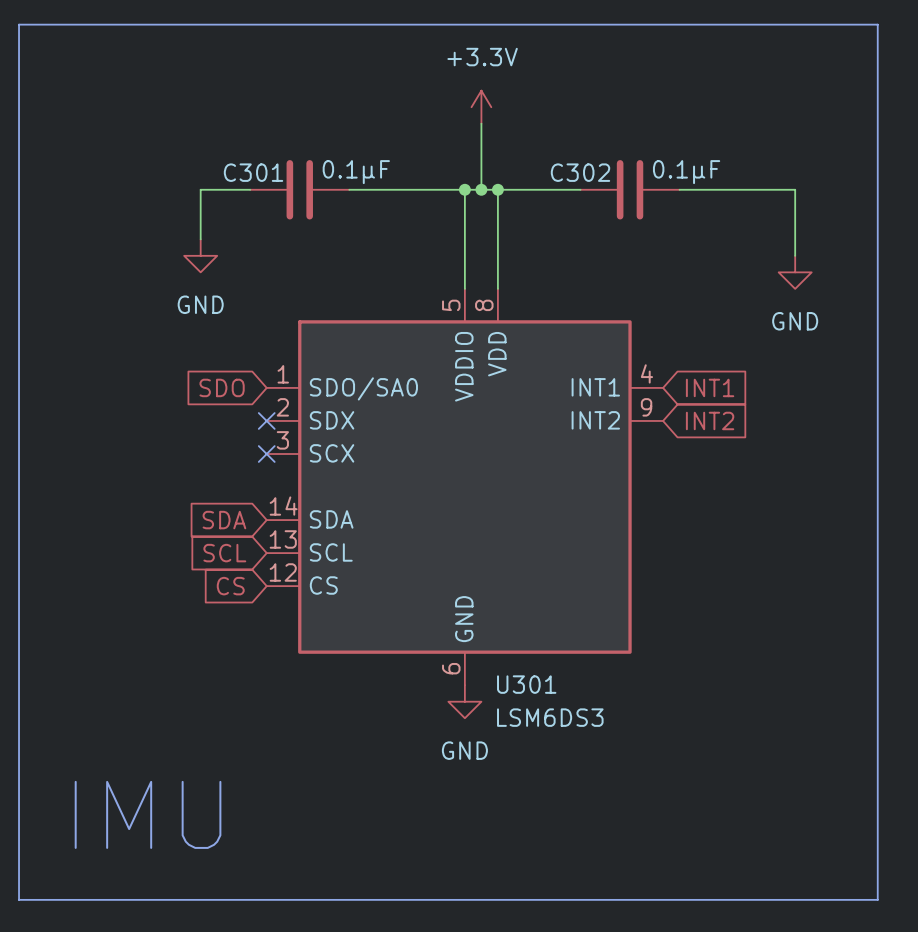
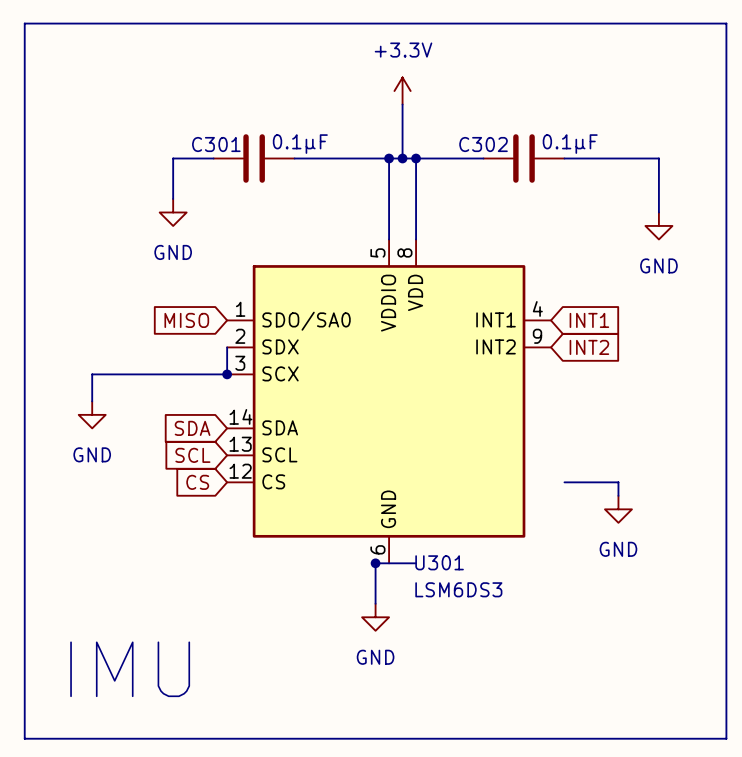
global label: SDO (222, 387) -> MISO (186, 320)
wire: none -> (227, 347) (227, 374) (92, 374) (92, 401)
no-connect mark: (266, 420) -> none
no-connect mark: (266, 454) -> none
junction: none -> (227, 374)
power symbol: none -> GND (92, 414)
wire: none -> (564, 482) (618, 482) (618, 495)
power symbol: none -> GND (618, 509)
junction: none -> (375, 563)
wire: none -> (416, 563) (375, 563) (375, 603)
power symbol position: GND (464, 701) -> GND (375, 617)

